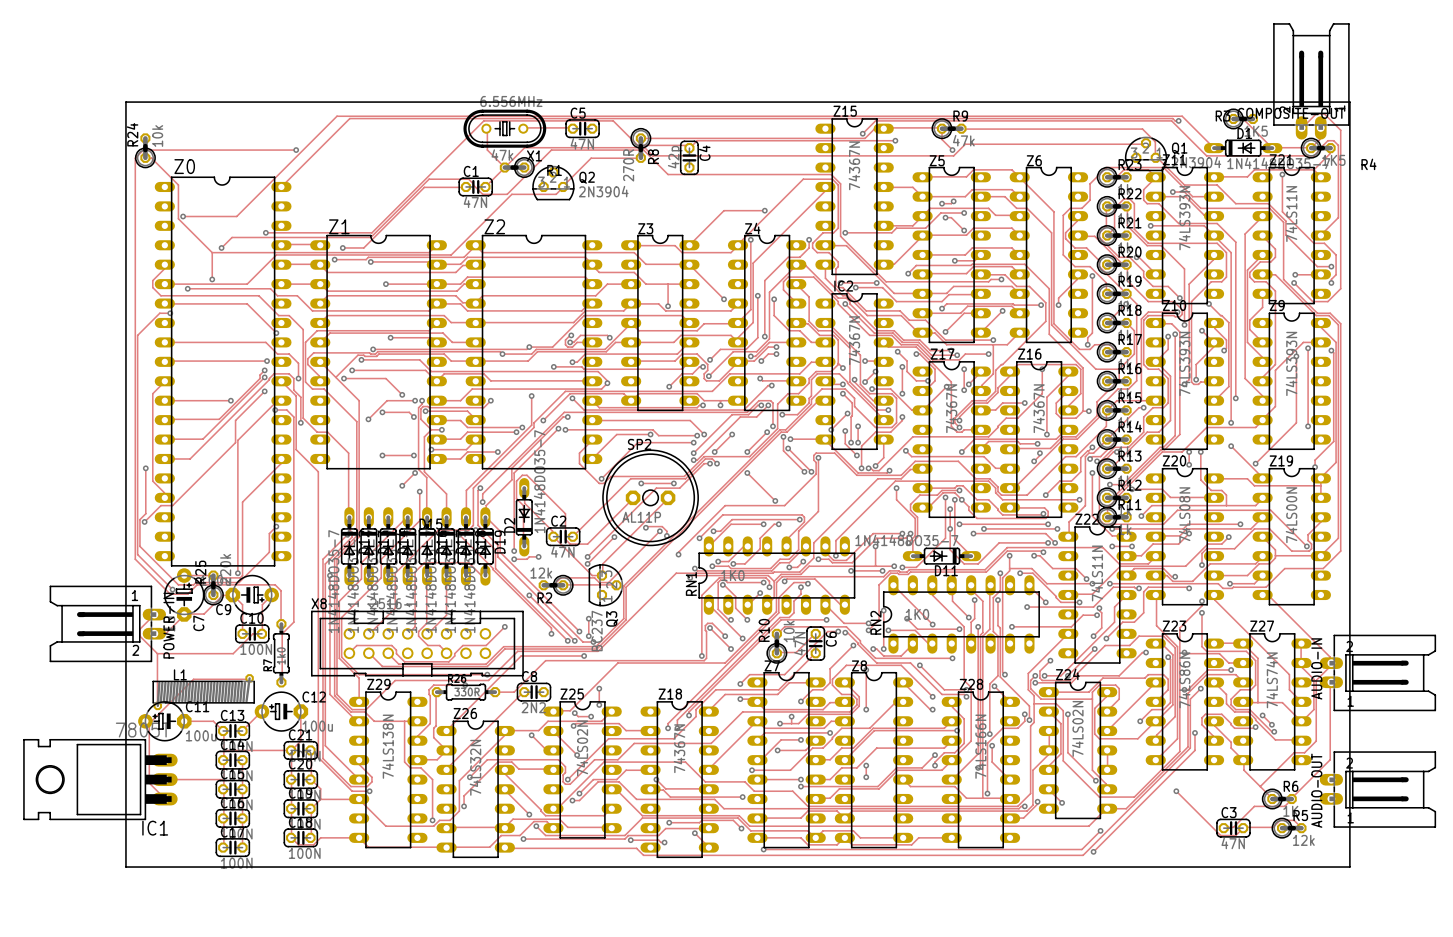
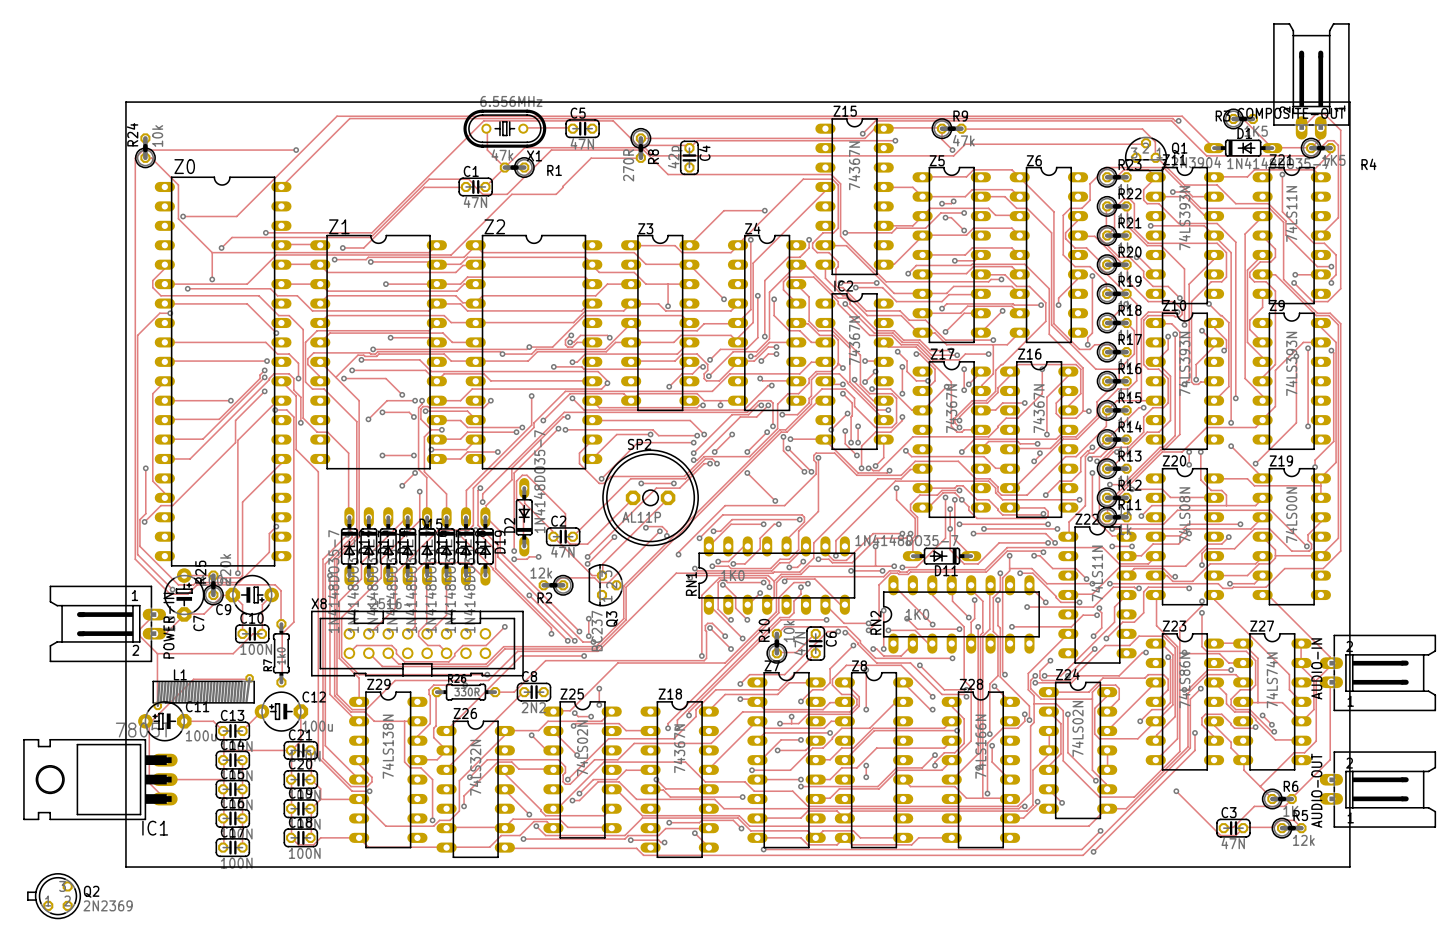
Q2 footprint: [532, 166, 575, 201] -> [27, 873, 81, 919]
Q2 value: 2N3904 (603, 191) -> 2N2369 (108, 905)
track: (563, 585) (616, 585) -> none

